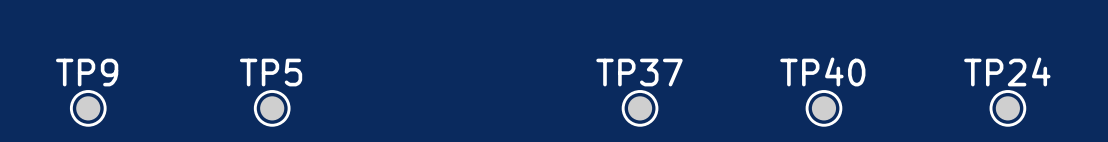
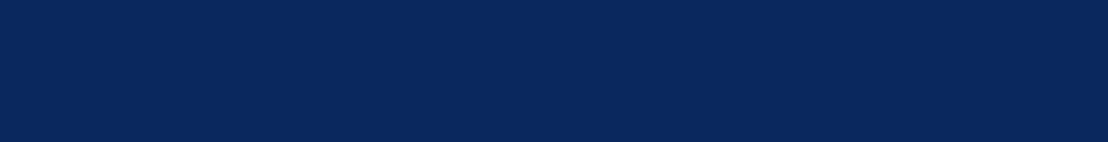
TP9: (88, 108) -> none
TP5: (272, 108) -> none
TP37: (640, 108) -> none
TP40: (823, 108) -> none
TP24: (1007, 108) -> none

